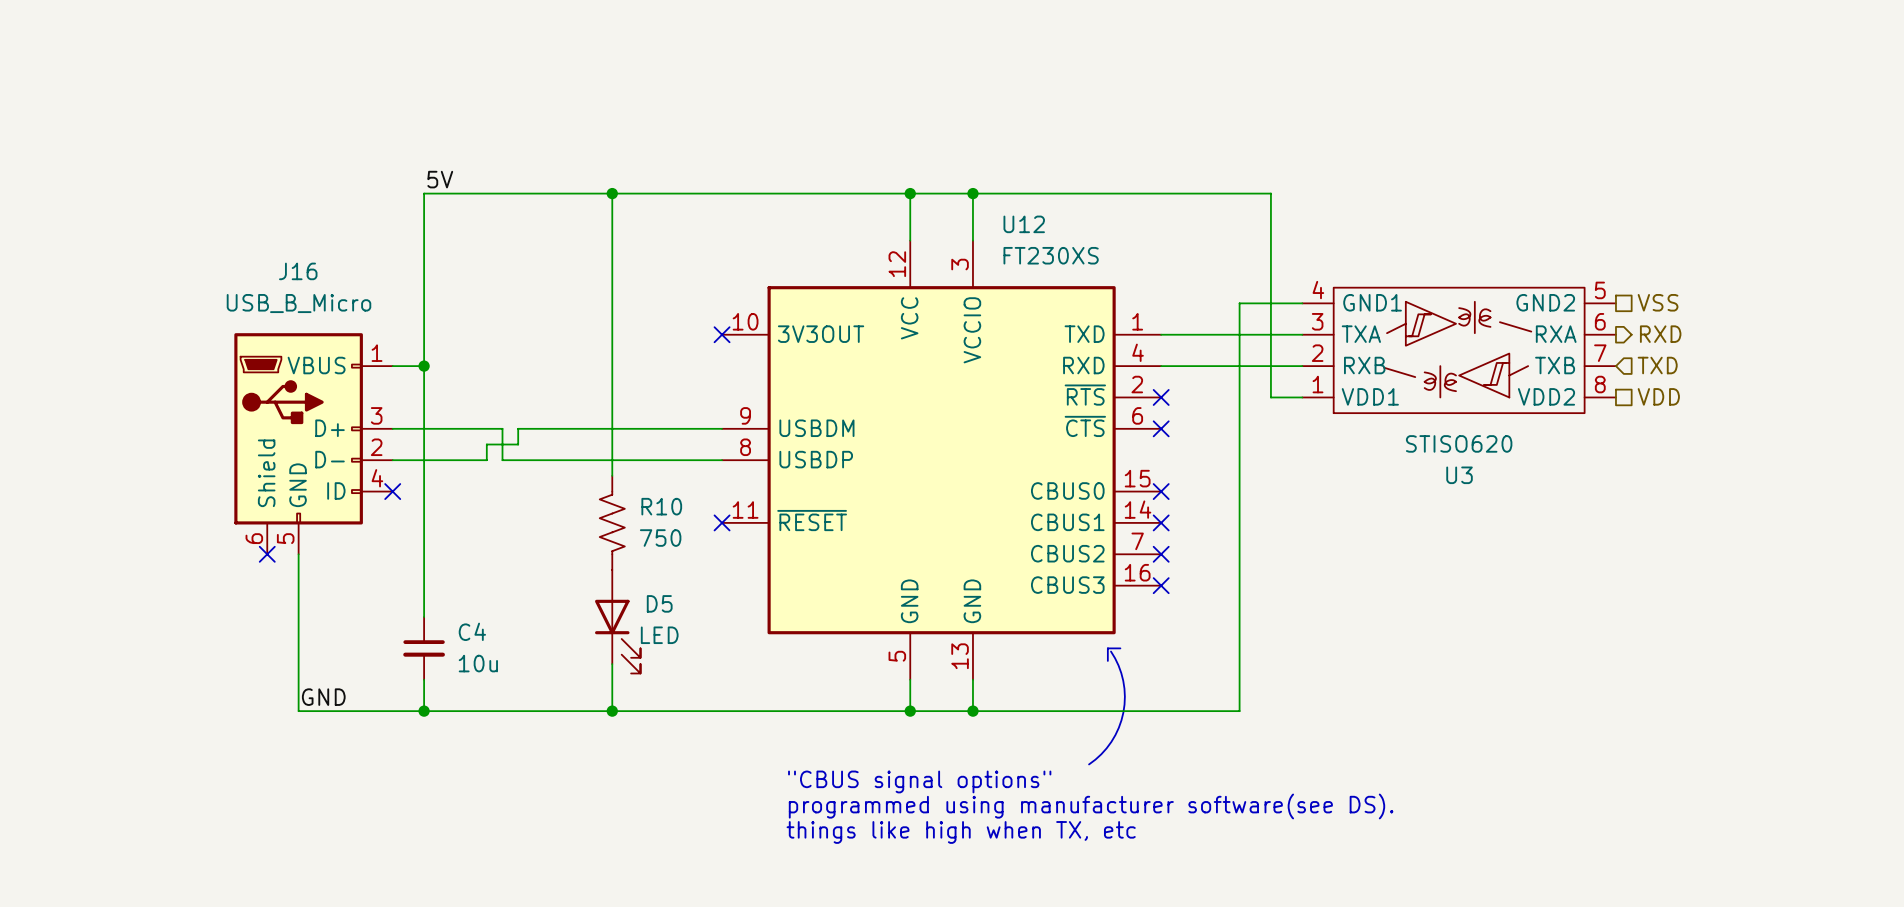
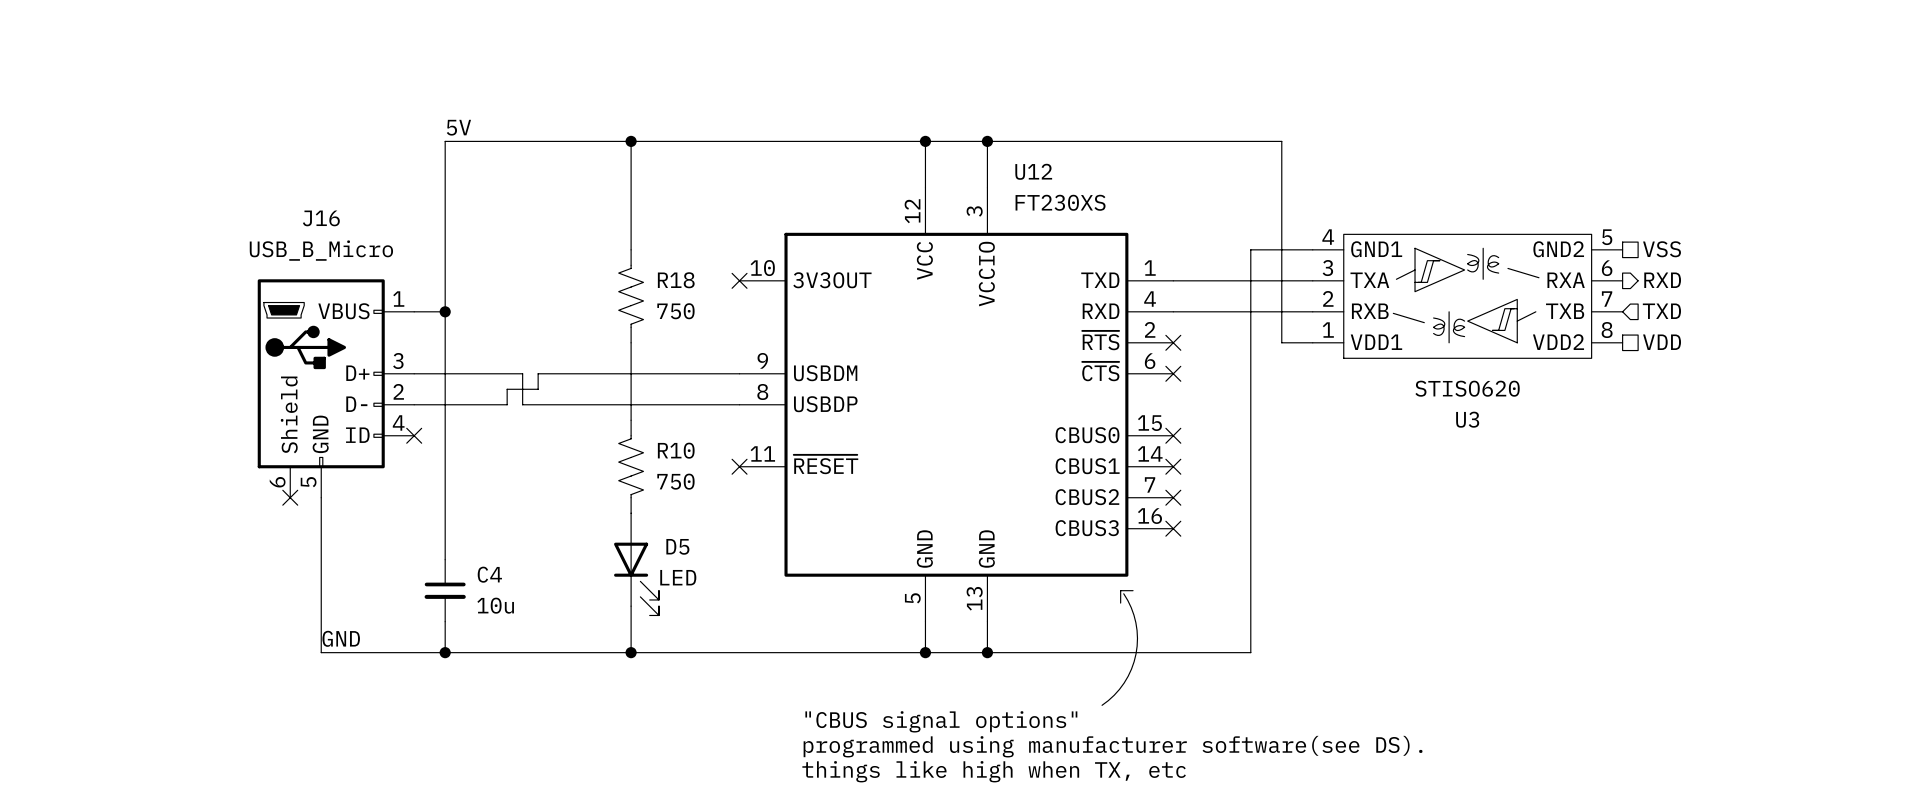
R18: none -> 750 (631, 296)

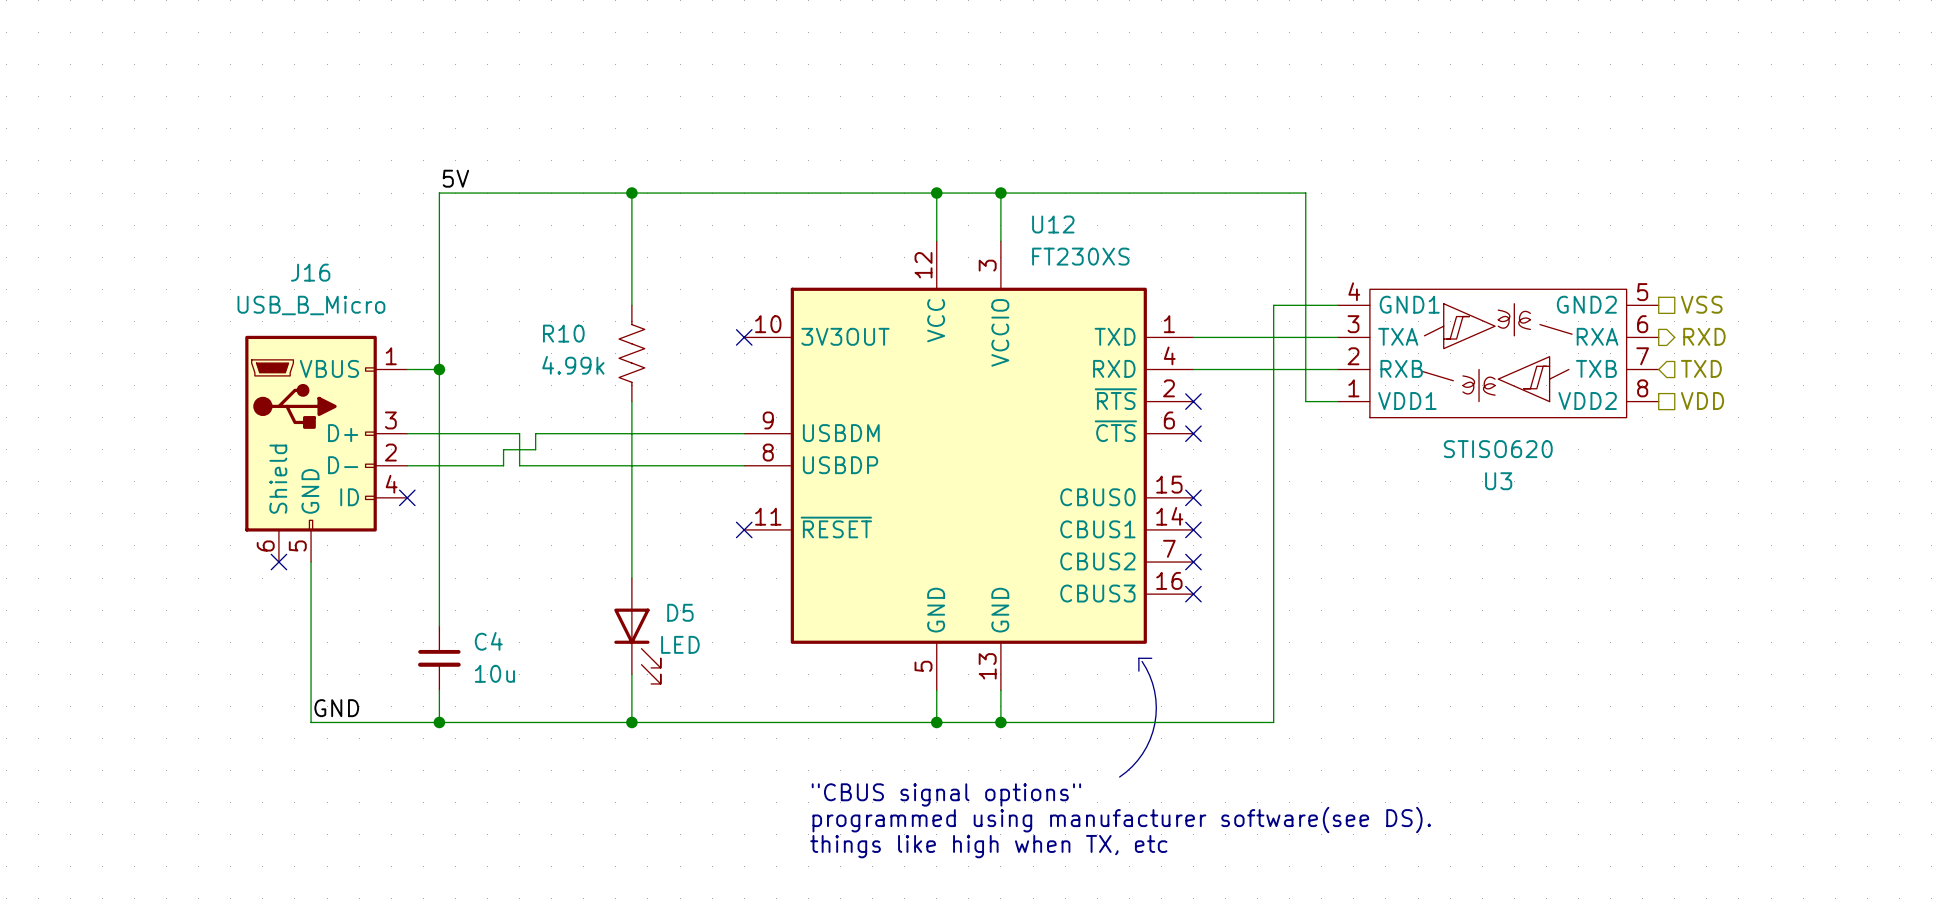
R18: 750 (631, 296) -> none
wire: none -> (631, 481) (631, 578)
R10 flip: as is (631, 466) -> left-right (631, 353)
R10 position: (631, 466) -> (631, 353)
R10 value: 750 (675, 481) -> 4.99k (573, 365)

